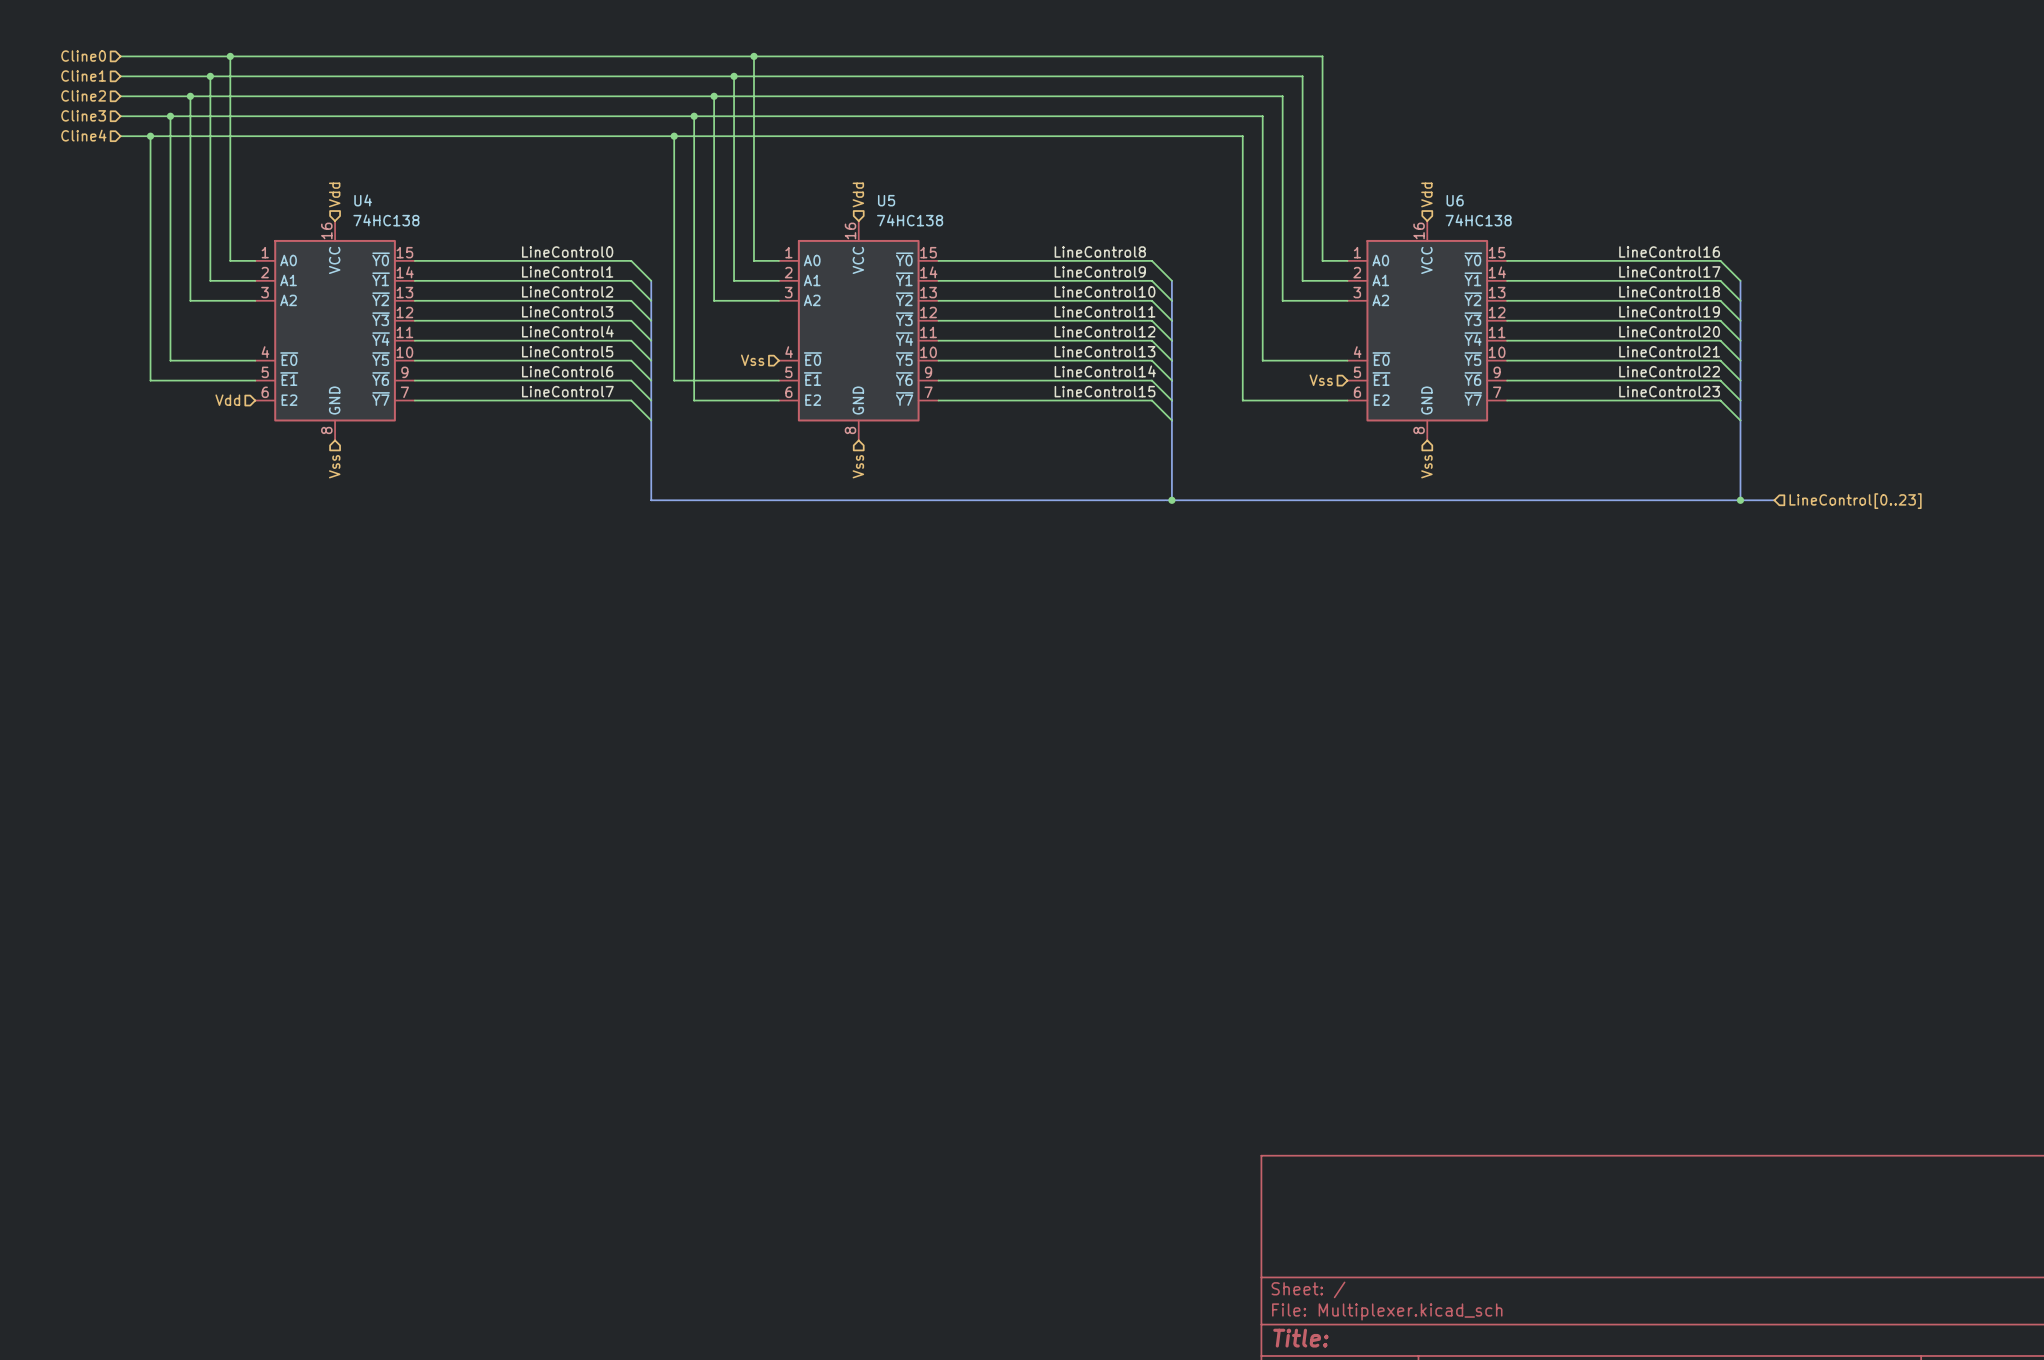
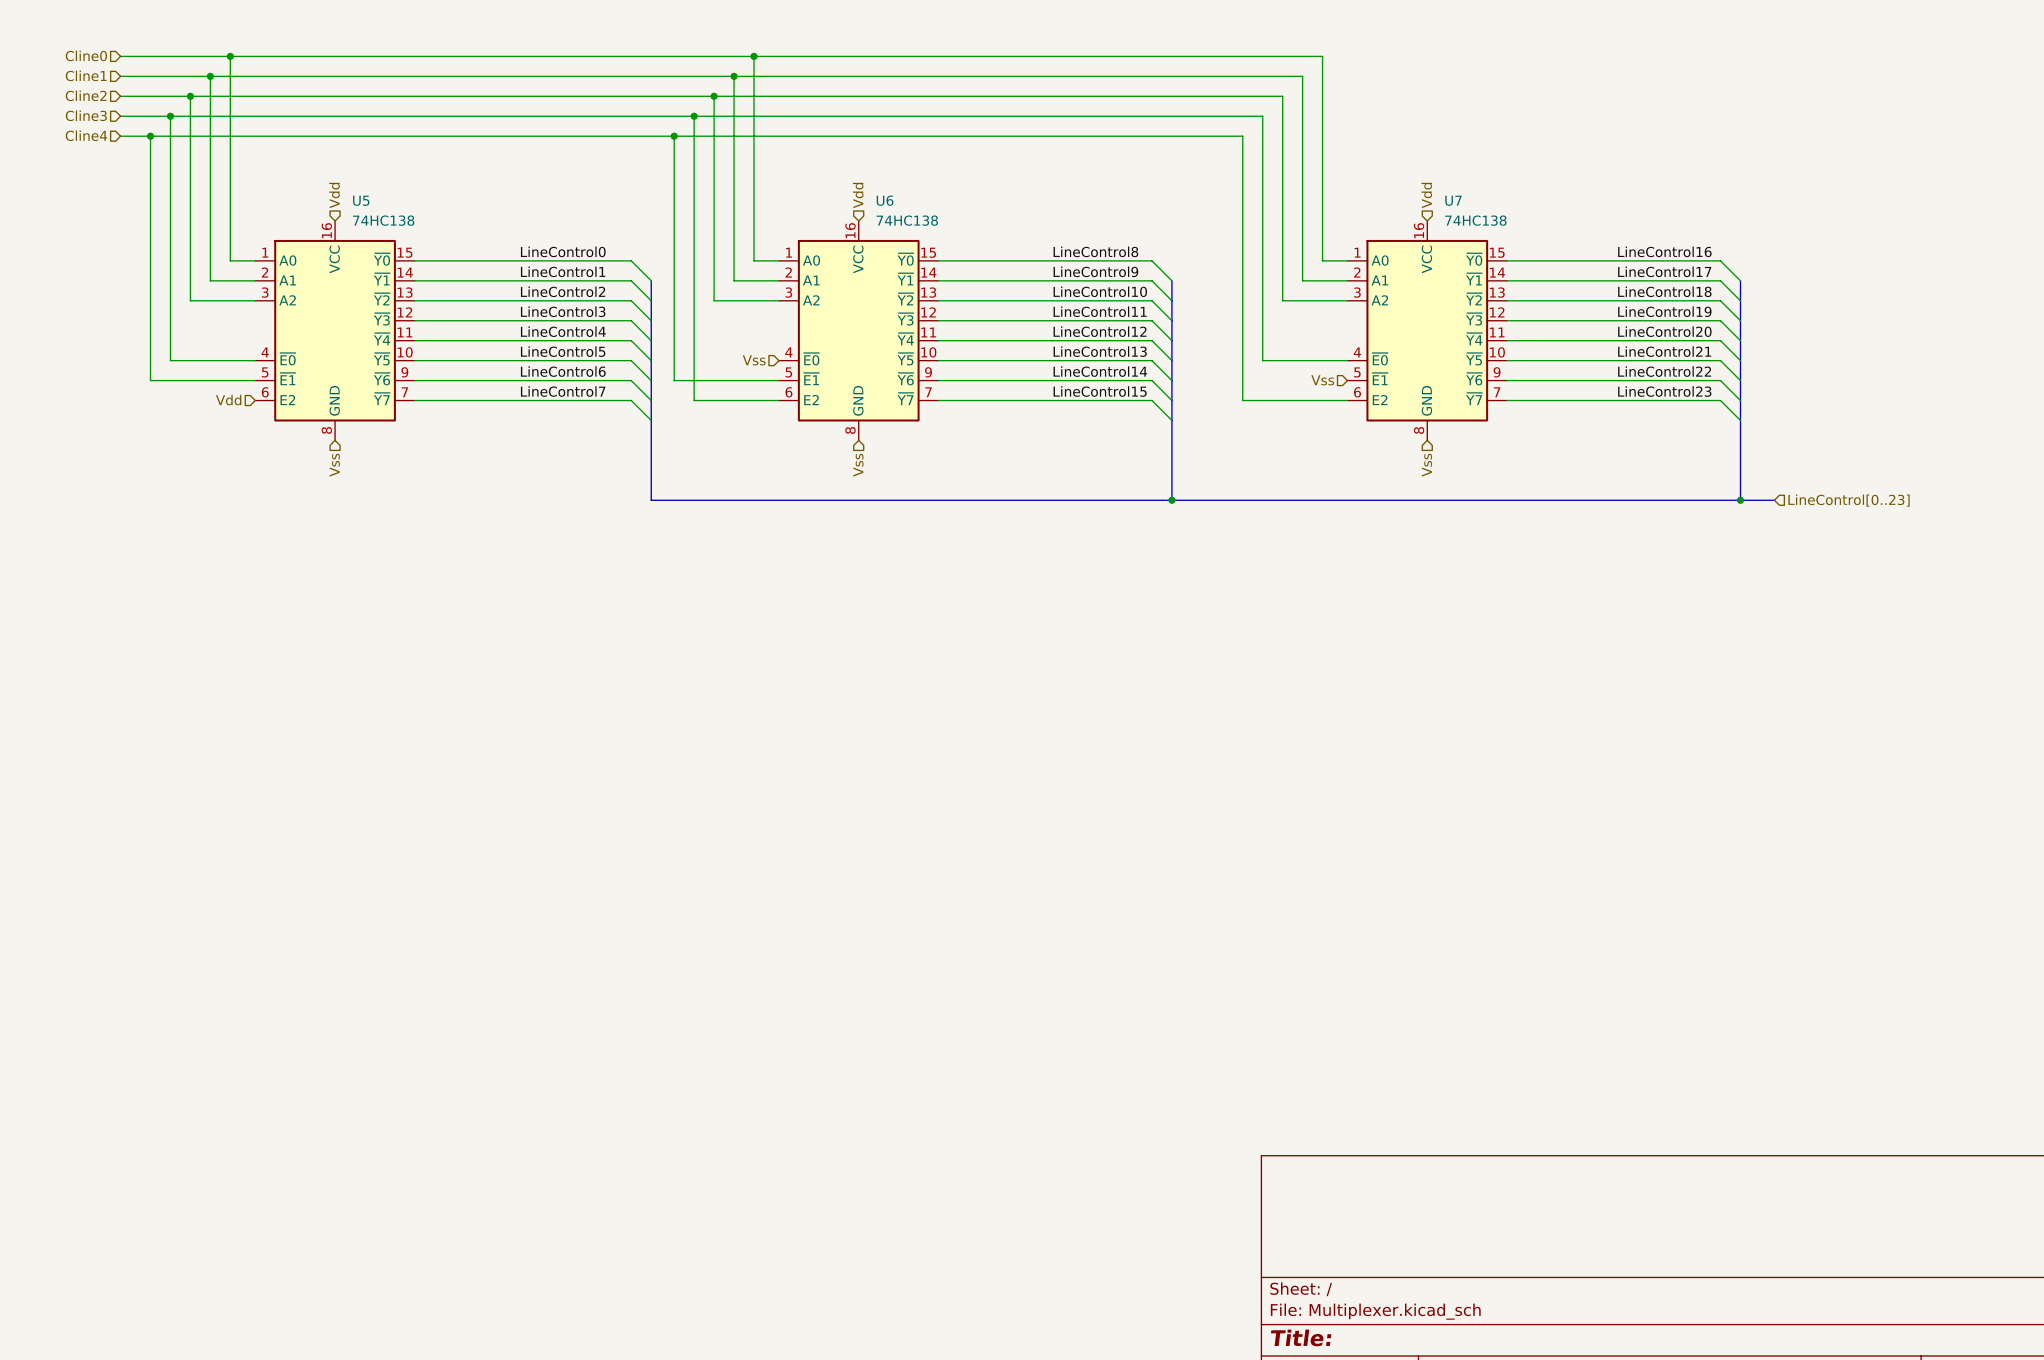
U4 name: U4 (363, 200) -> U5 (361, 200)
U5 name: U5 (886, 200) -> U6 (885, 200)
U6 name: U6 (1455, 200) -> U7 (1453, 200)

